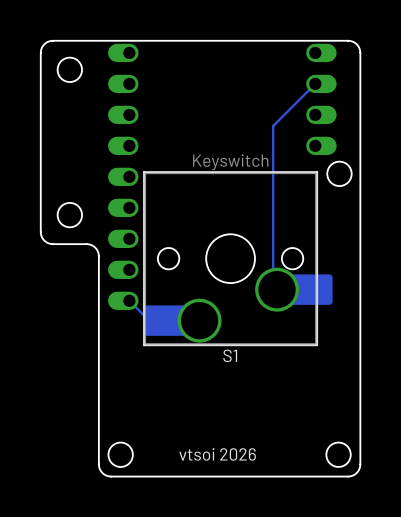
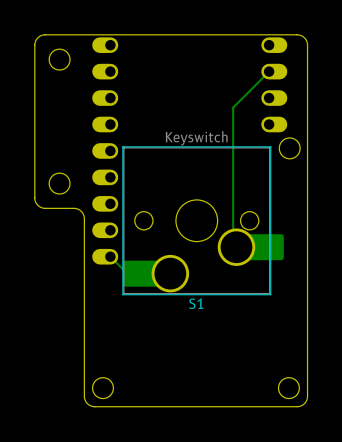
text: vtsoi 2026 (217, 454) -> none

